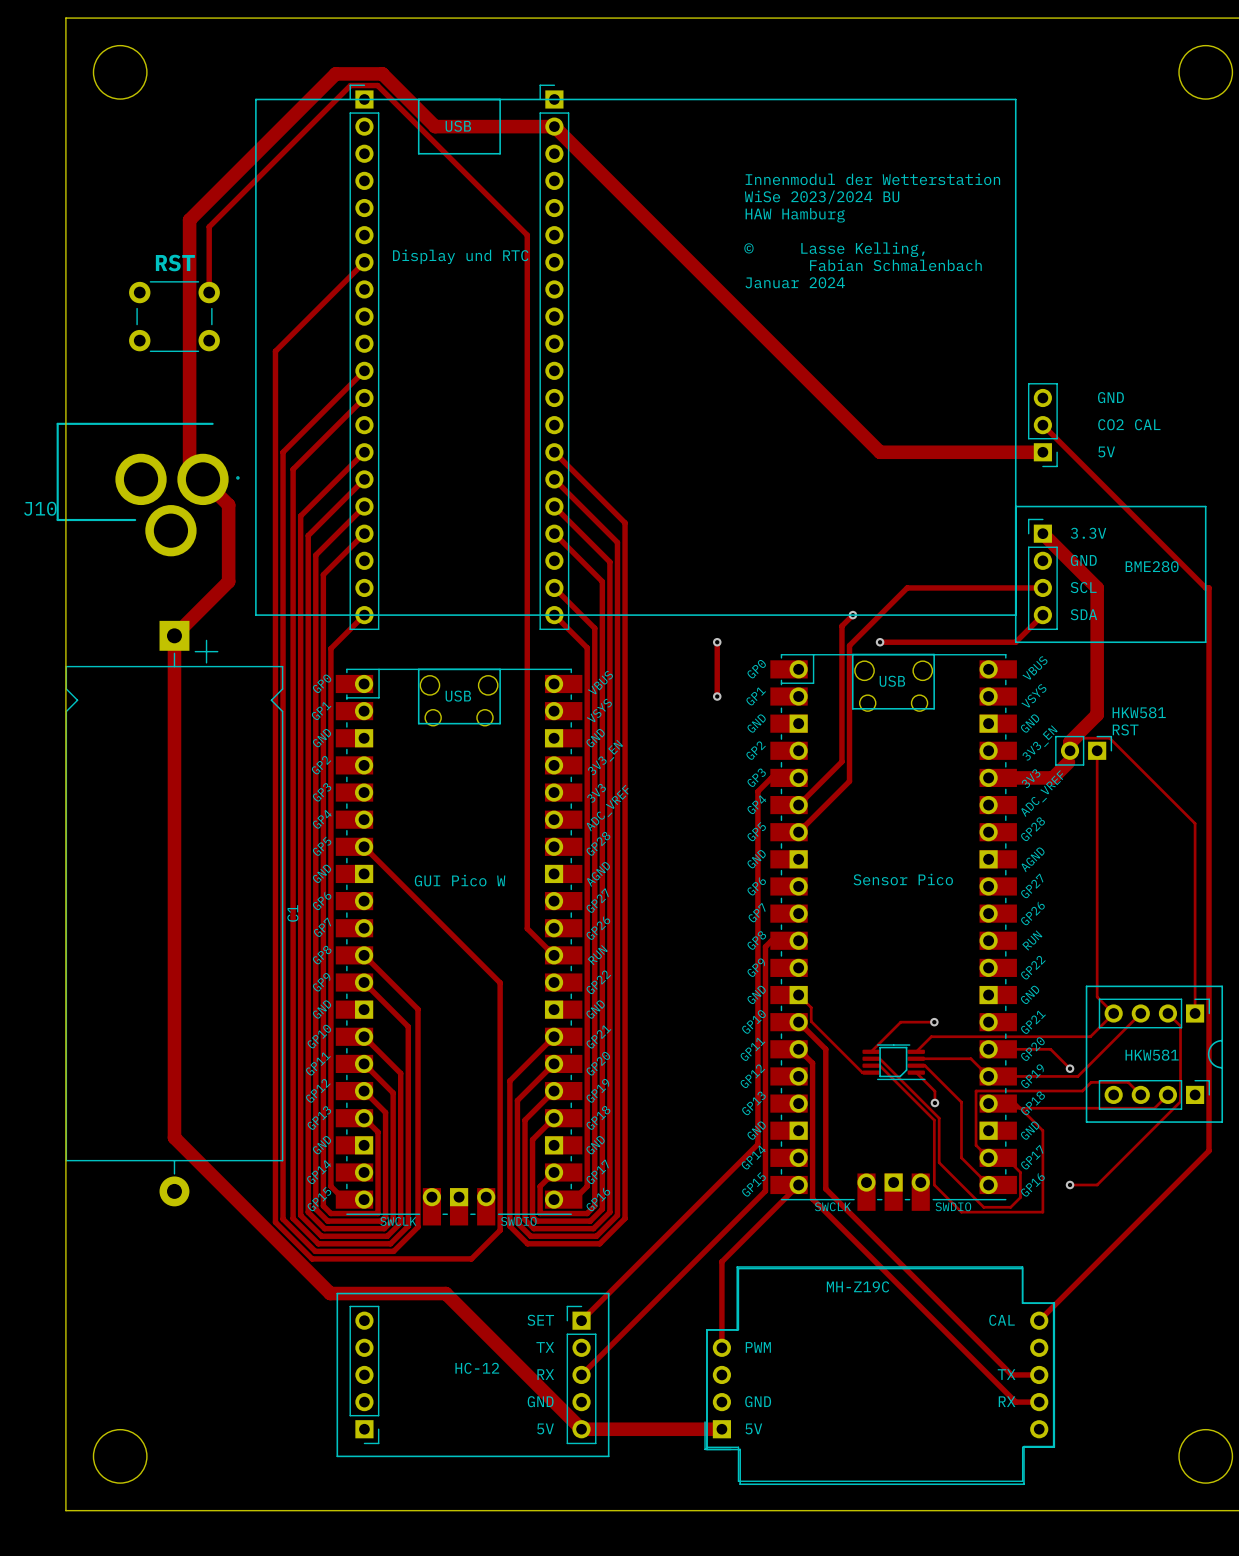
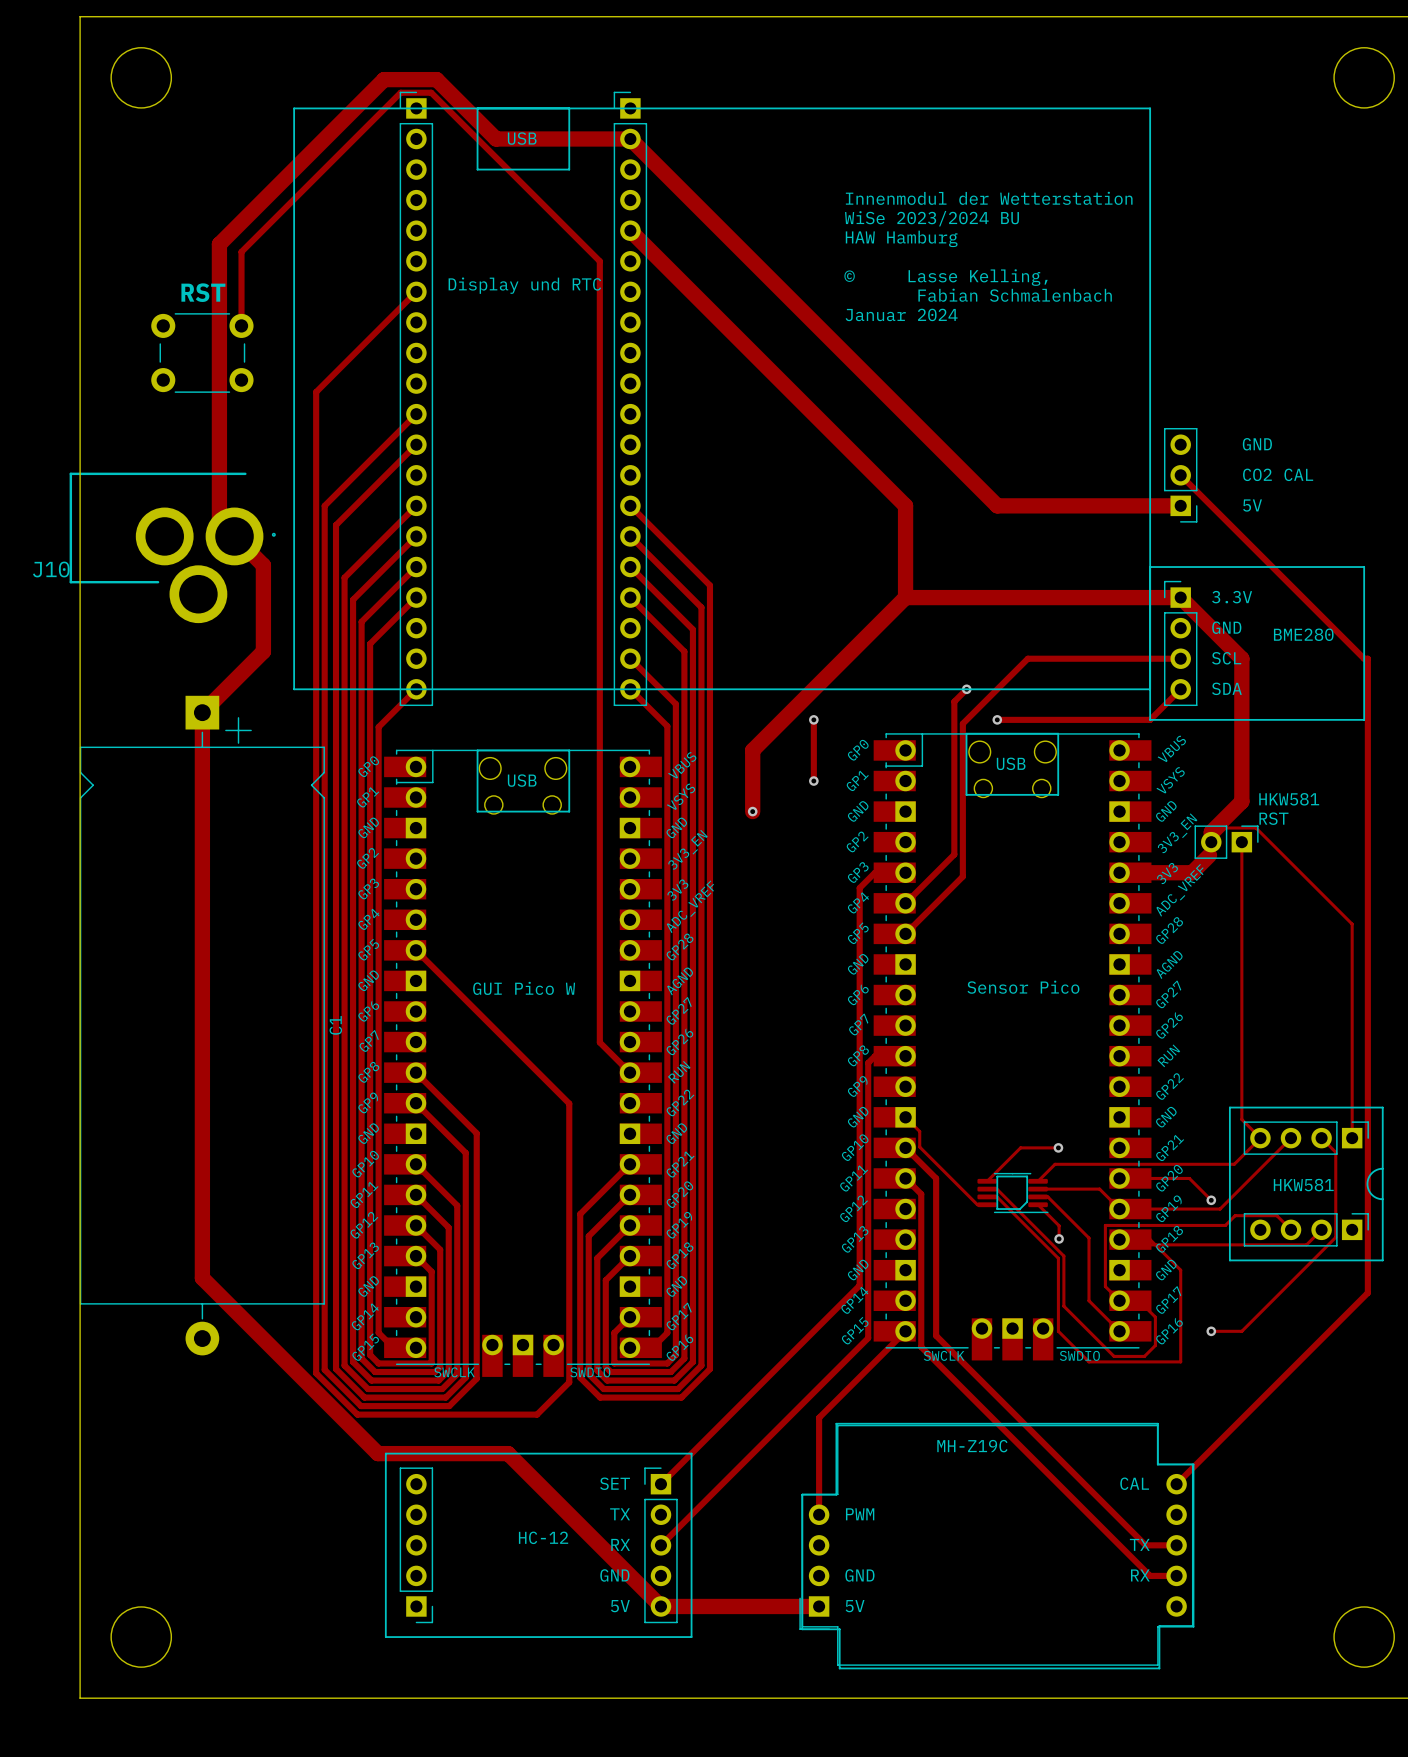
track: none -> (630, 230) (905, 505) (905, 597)
track: none -> (905, 597) (1180, 597)
track: none -> (905, 597) (752, 750) (752, 811)
via: none -> (752, 811)

